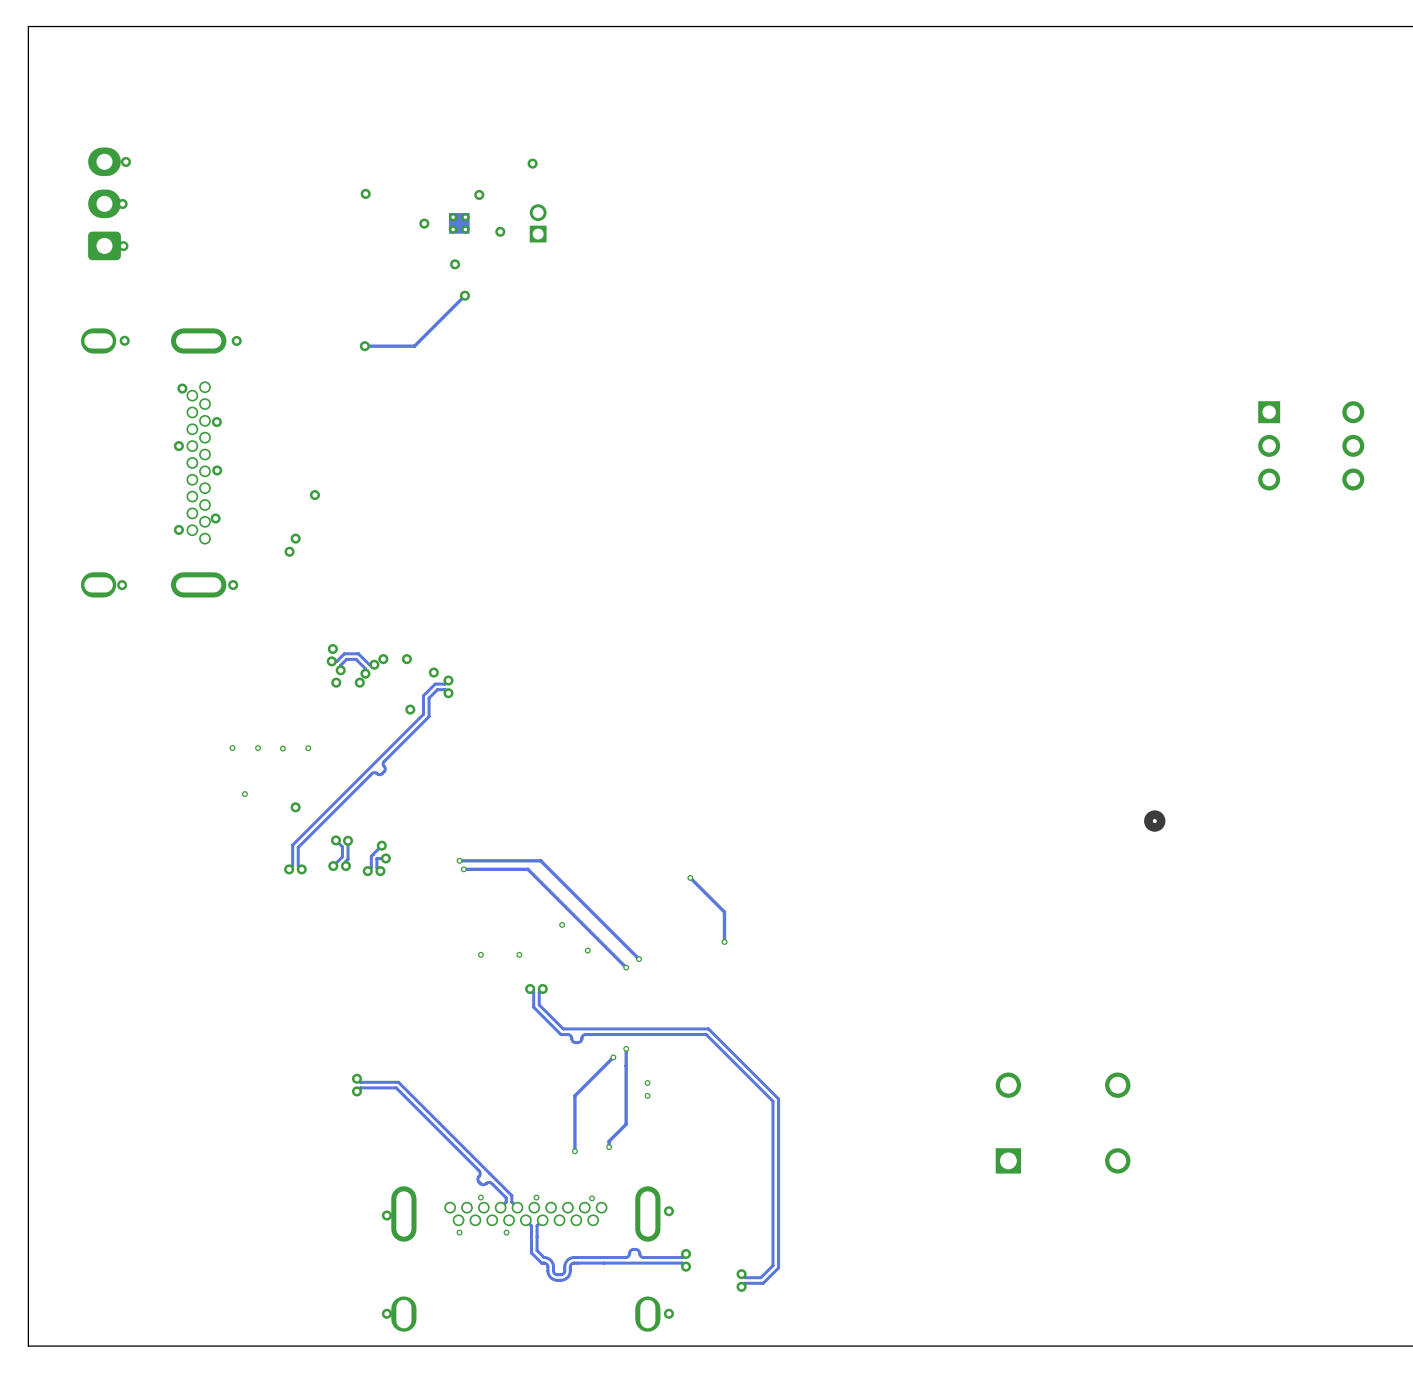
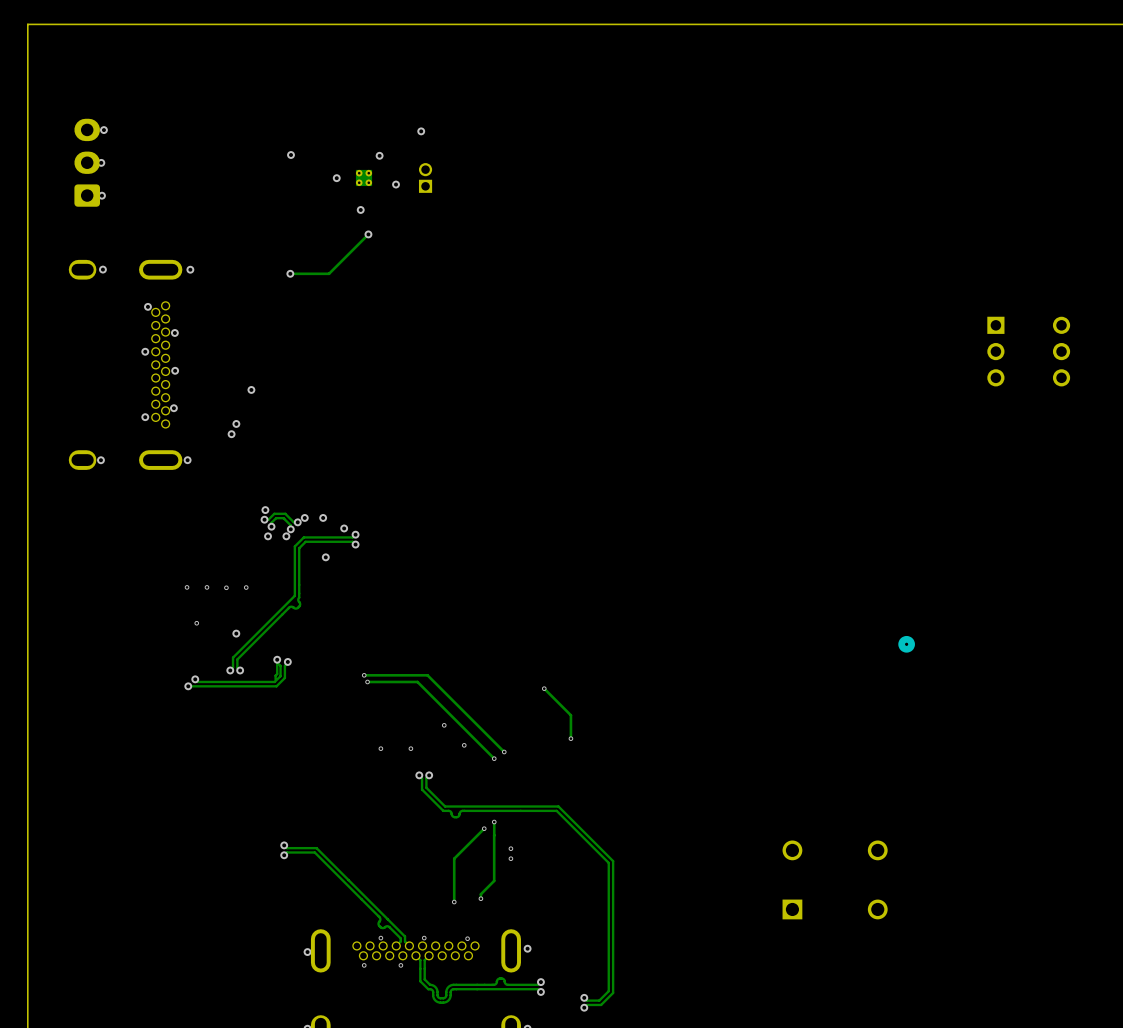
track: (435, 684) (423, 695) (423, 714) (292, 845) (292, 865) (289, 869) -> (345, 537) (303, 537) (294, 546) (294, 595) (233, 657) (233, 667) (230, 670)
track: (437, 689) (429, 698) (429, 716) (383, 761) (384, 771) (380, 774) (372, 773) (298, 847) (298, 865) (301, 869) -> (347, 541) (305, 541) (299, 548) (298, 599) (299, 605) (296, 608) (289, 607) (237, 659) (237, 667) (240, 670)
track: (335, 840) (342, 846) (342, 856) (333, 866) -> none
via: (335, 840) -> none
via: none -> (287, 661)
track: none -> (277, 663) (280, 665) (280, 676) (274, 681) (197, 681) (195, 679)
track: none -> (287, 663) (284, 665) (284, 677) (276, 686) (188, 686)
track: (381, 845) (373, 854) -> none
via: (381, 845) -> none
via: none -> (230, 670)
via: none -> (240, 670)
track: (373, 854) (371, 856) (371, 867) (367, 871) -> none
track: (385, 858) (376, 858) (376, 867) (380, 871) -> none
via: (385, 858) -> none
via: none -> (195, 679)
via: (333, 866) -> none
via: (345, 866) -> none
via: (289, 869) -> none
via: (301, 869) -> none
via: (367, 871) -> none
via: (380, 871) -> none
via: none -> (188, 686)

